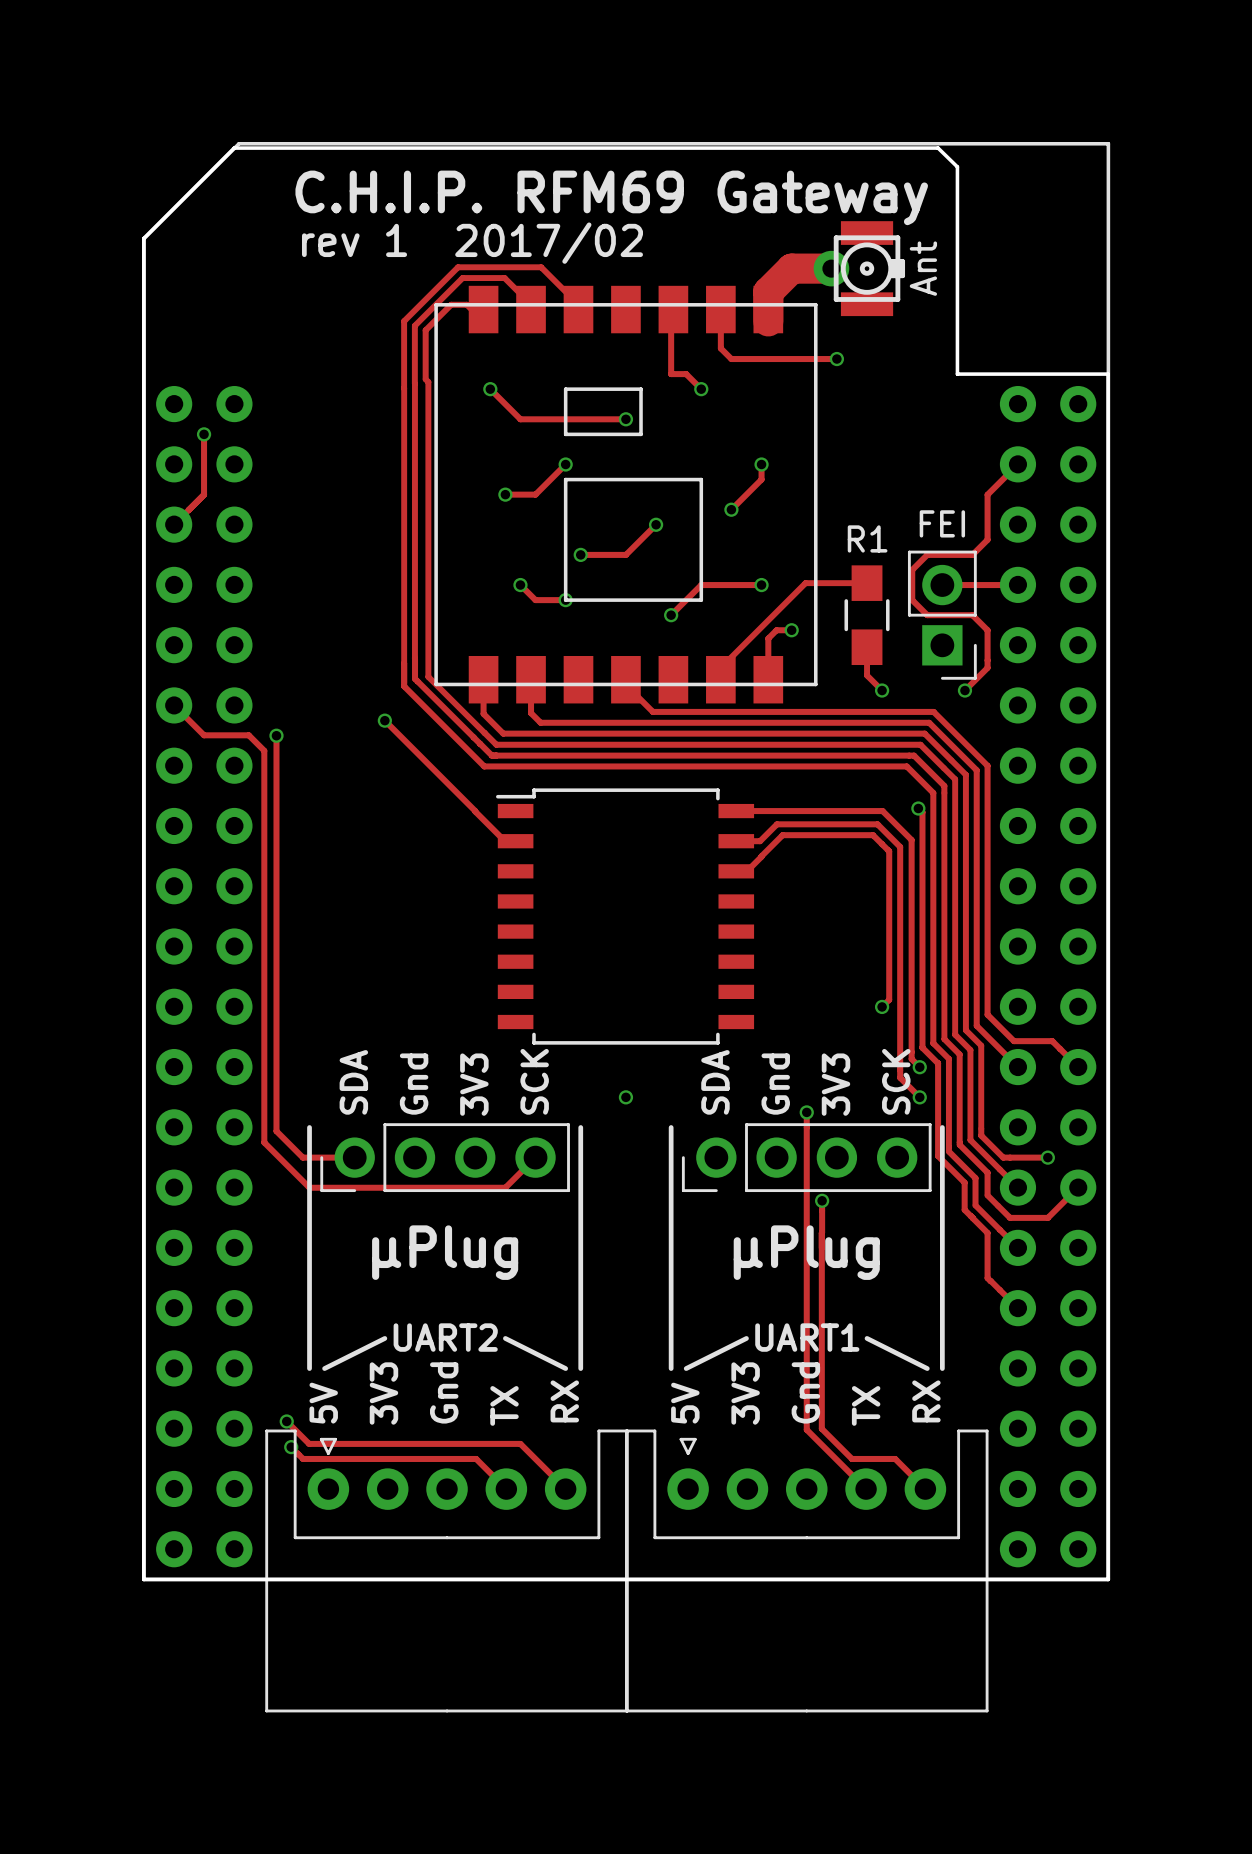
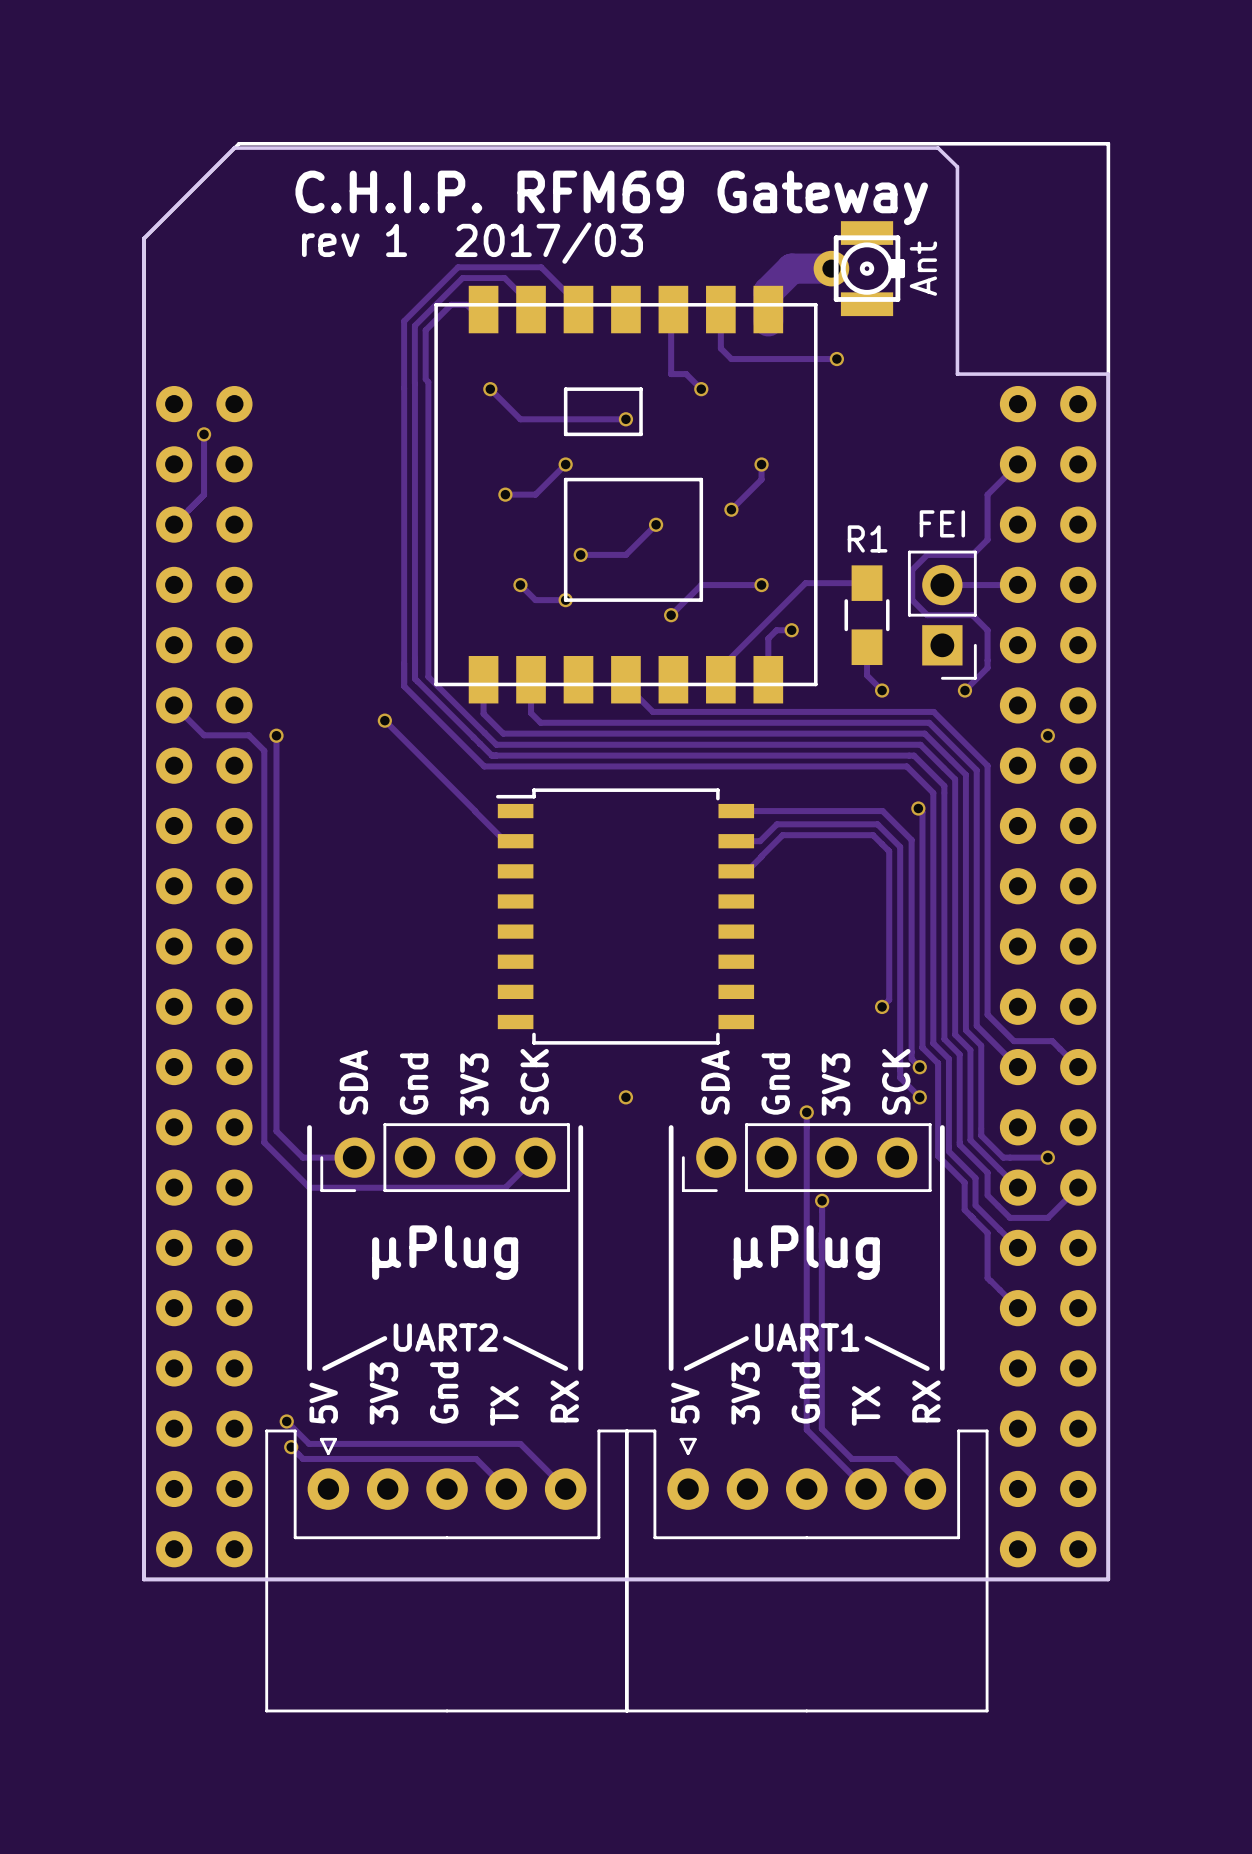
text: rev 1 2017/02 (472, 243) -> rev 1 2017/03 (472, 243)
via: none -> (1047, 735)

